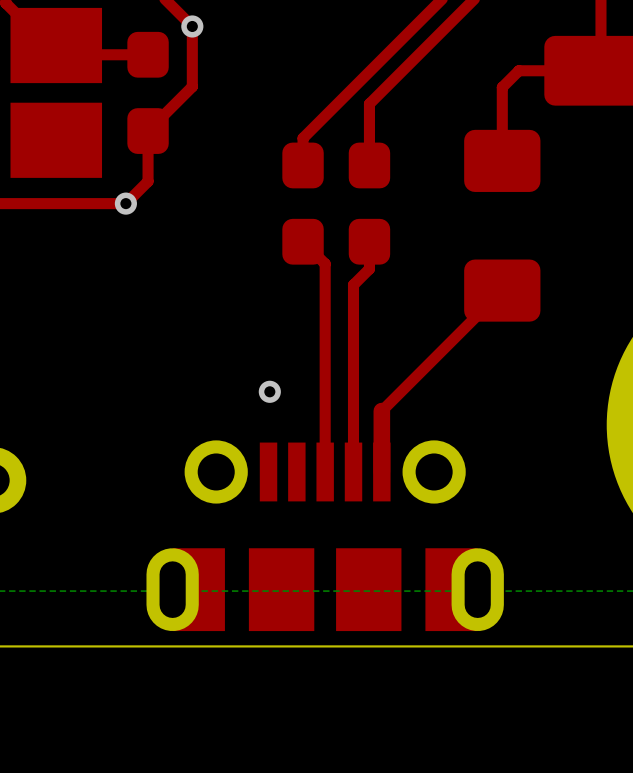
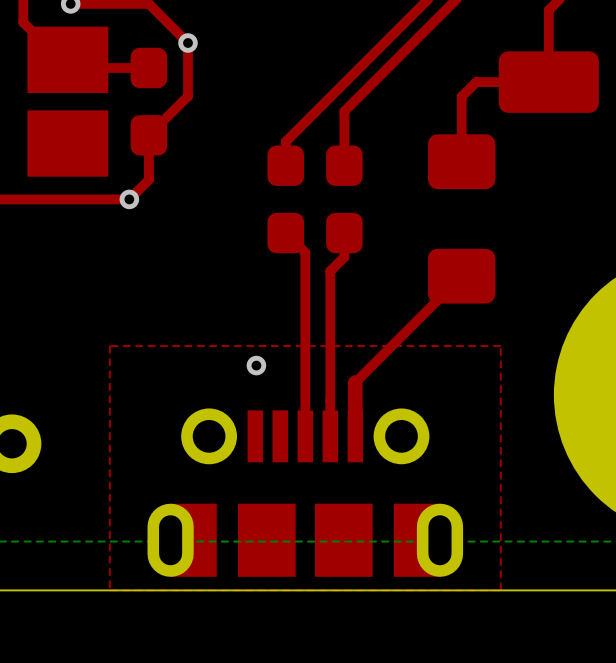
top zone outline: none -> (500, 346) (500, 590) (109, 590) (109, 346) (500, 346)

